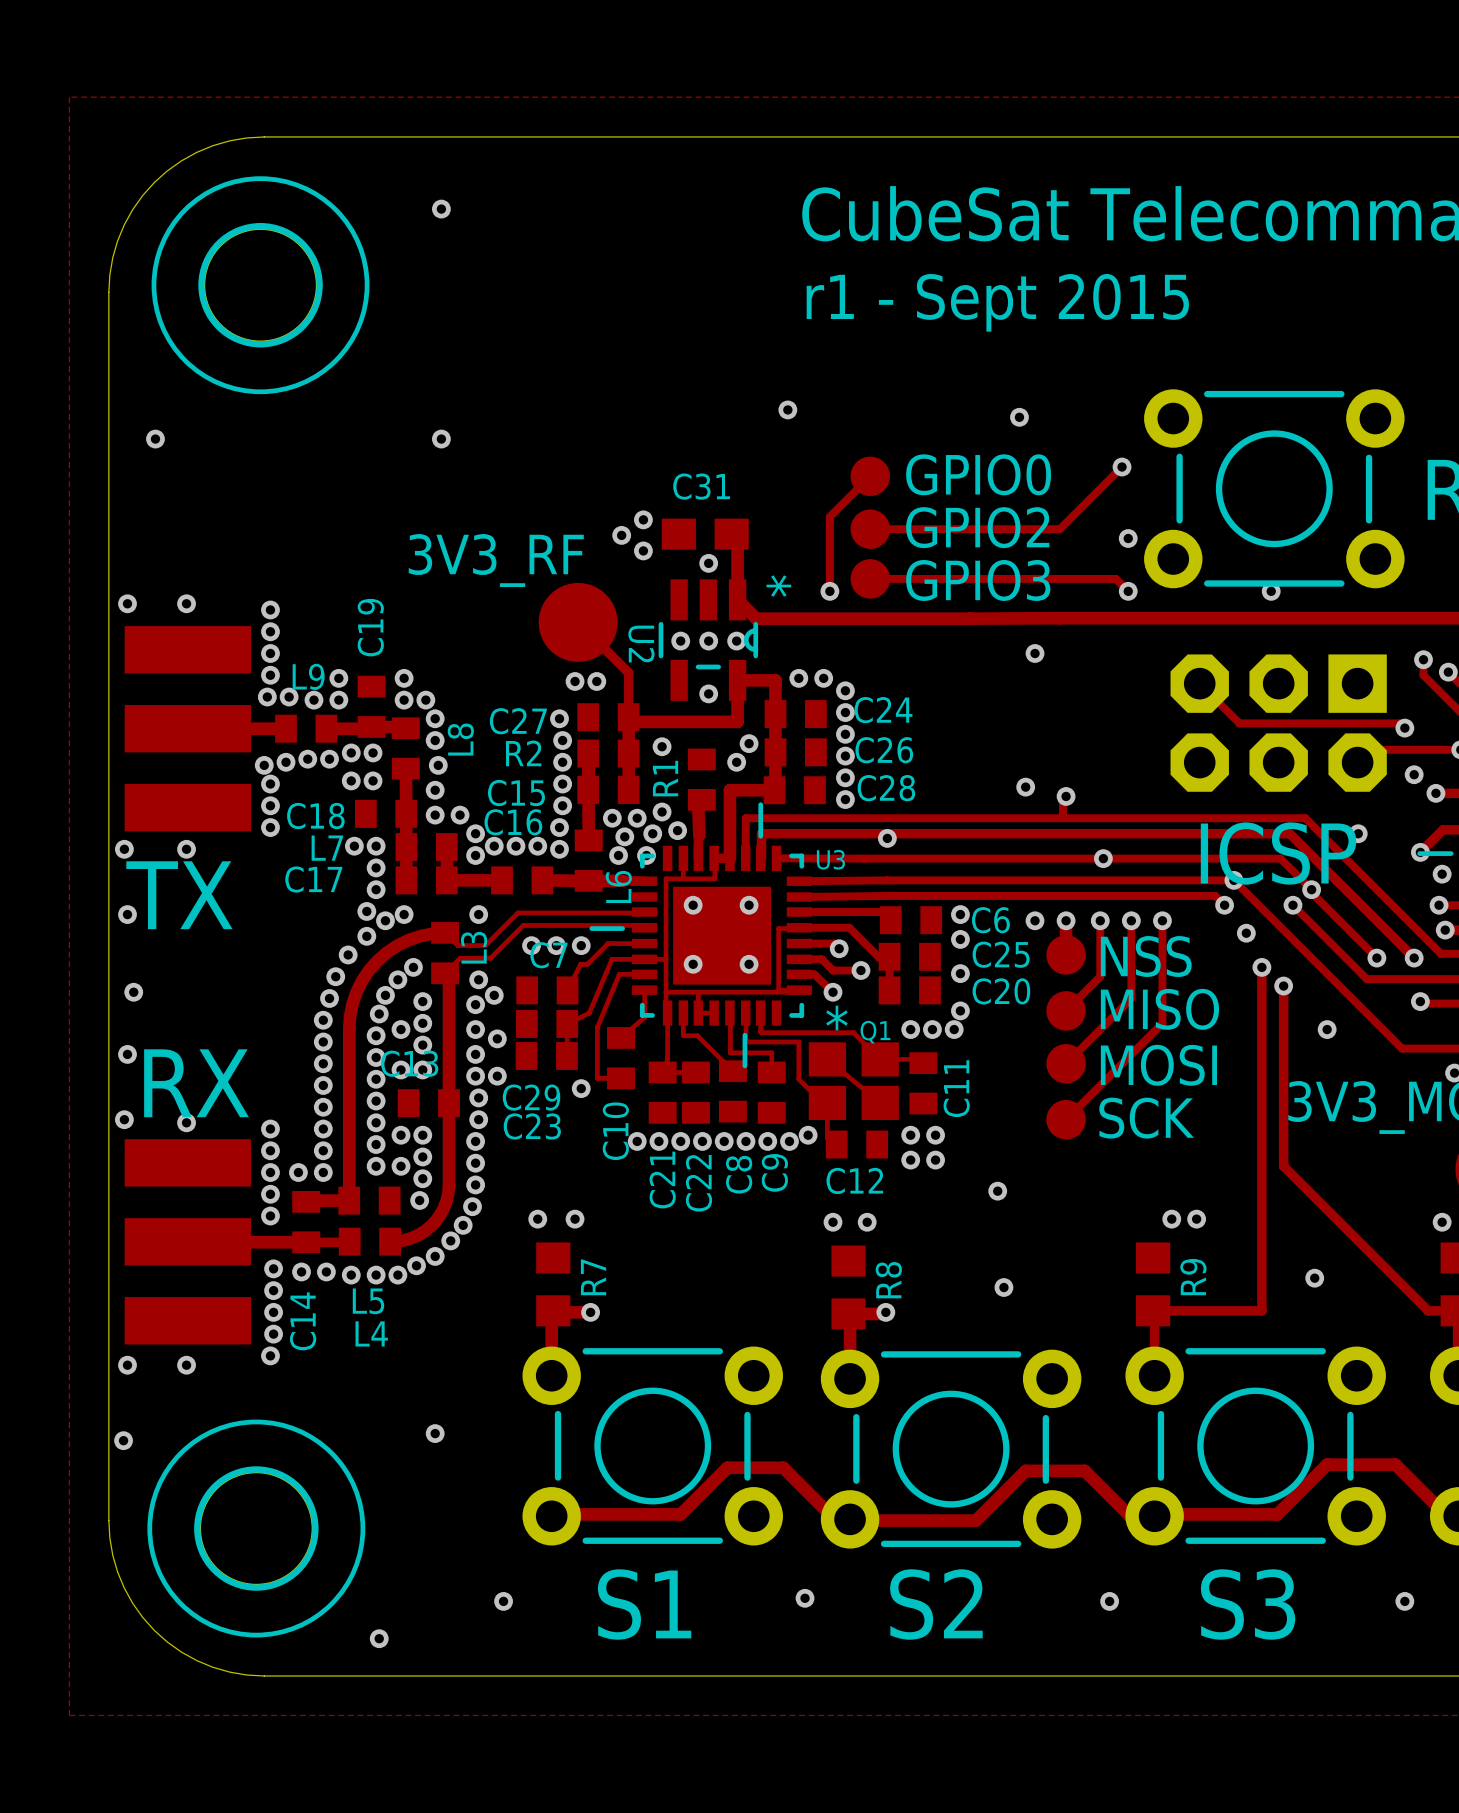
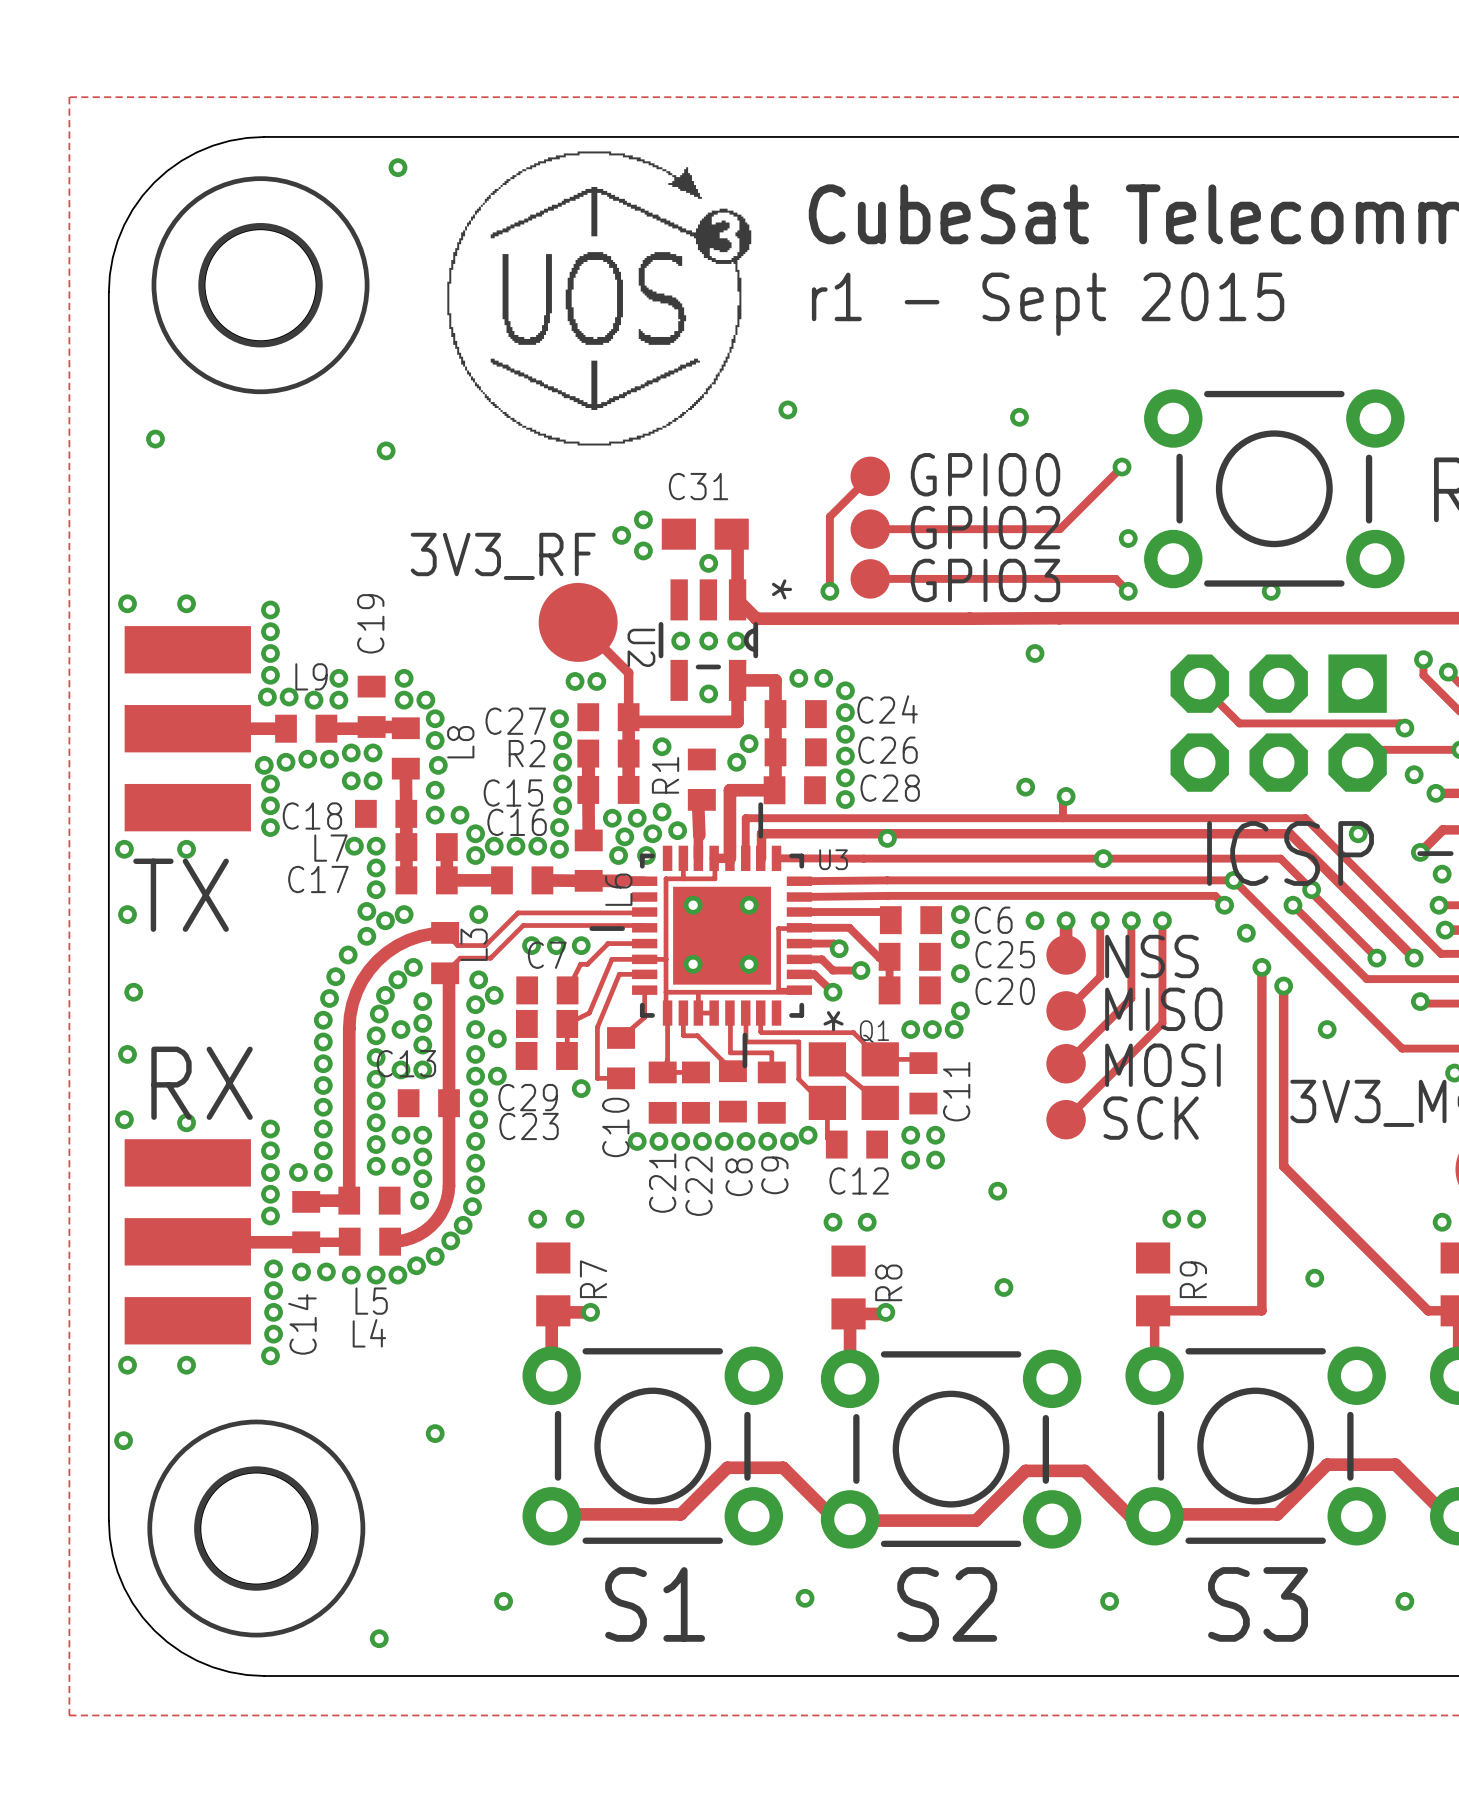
drawing: none -> [447, 151, 752, 446]
via position: (441, 209) -> (397, 167)
via position: (441, 439) -> (386, 450)

